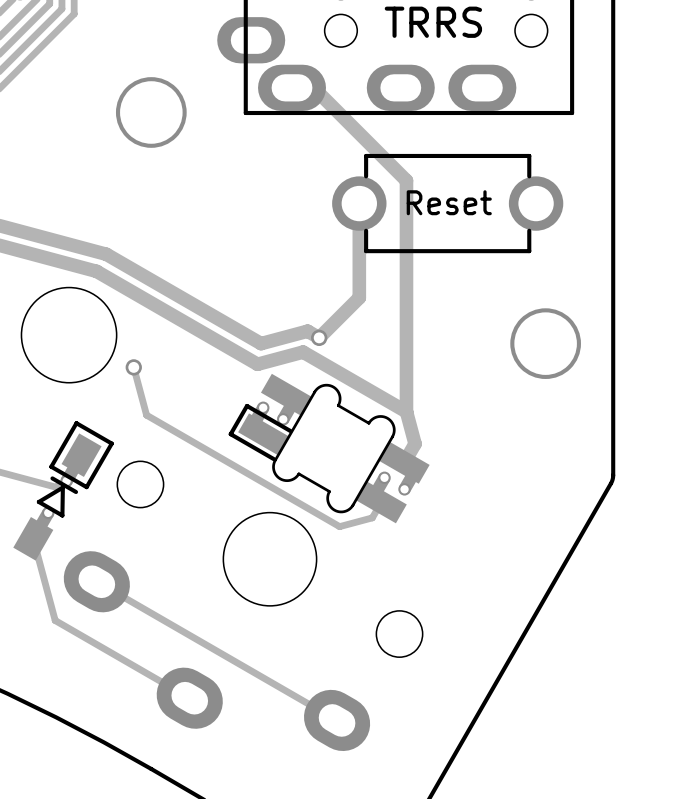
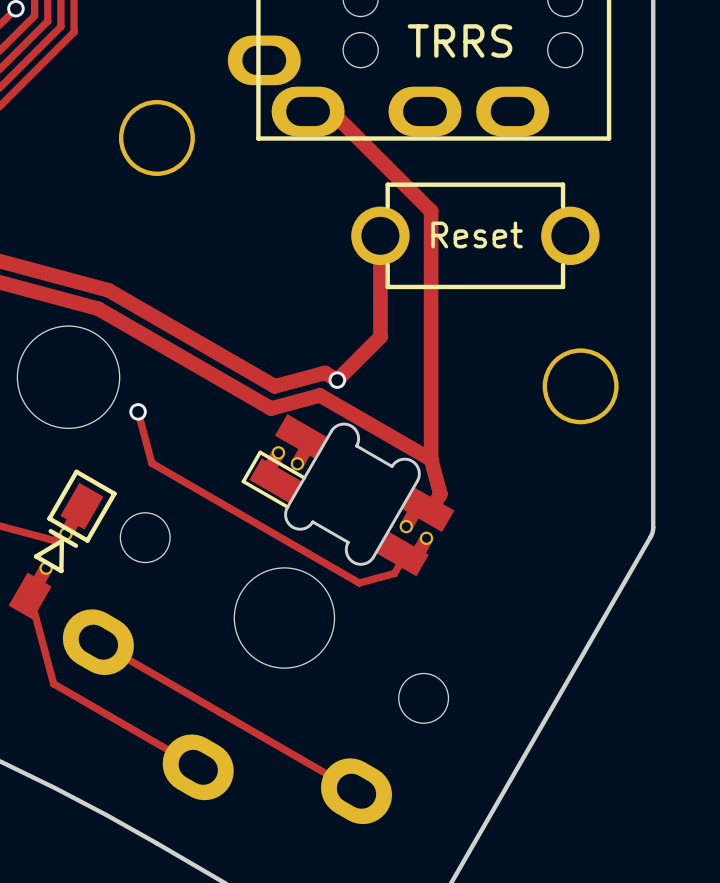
part footprint: [228, 373, 430, 524] -> [241, 414, 455, 577]

